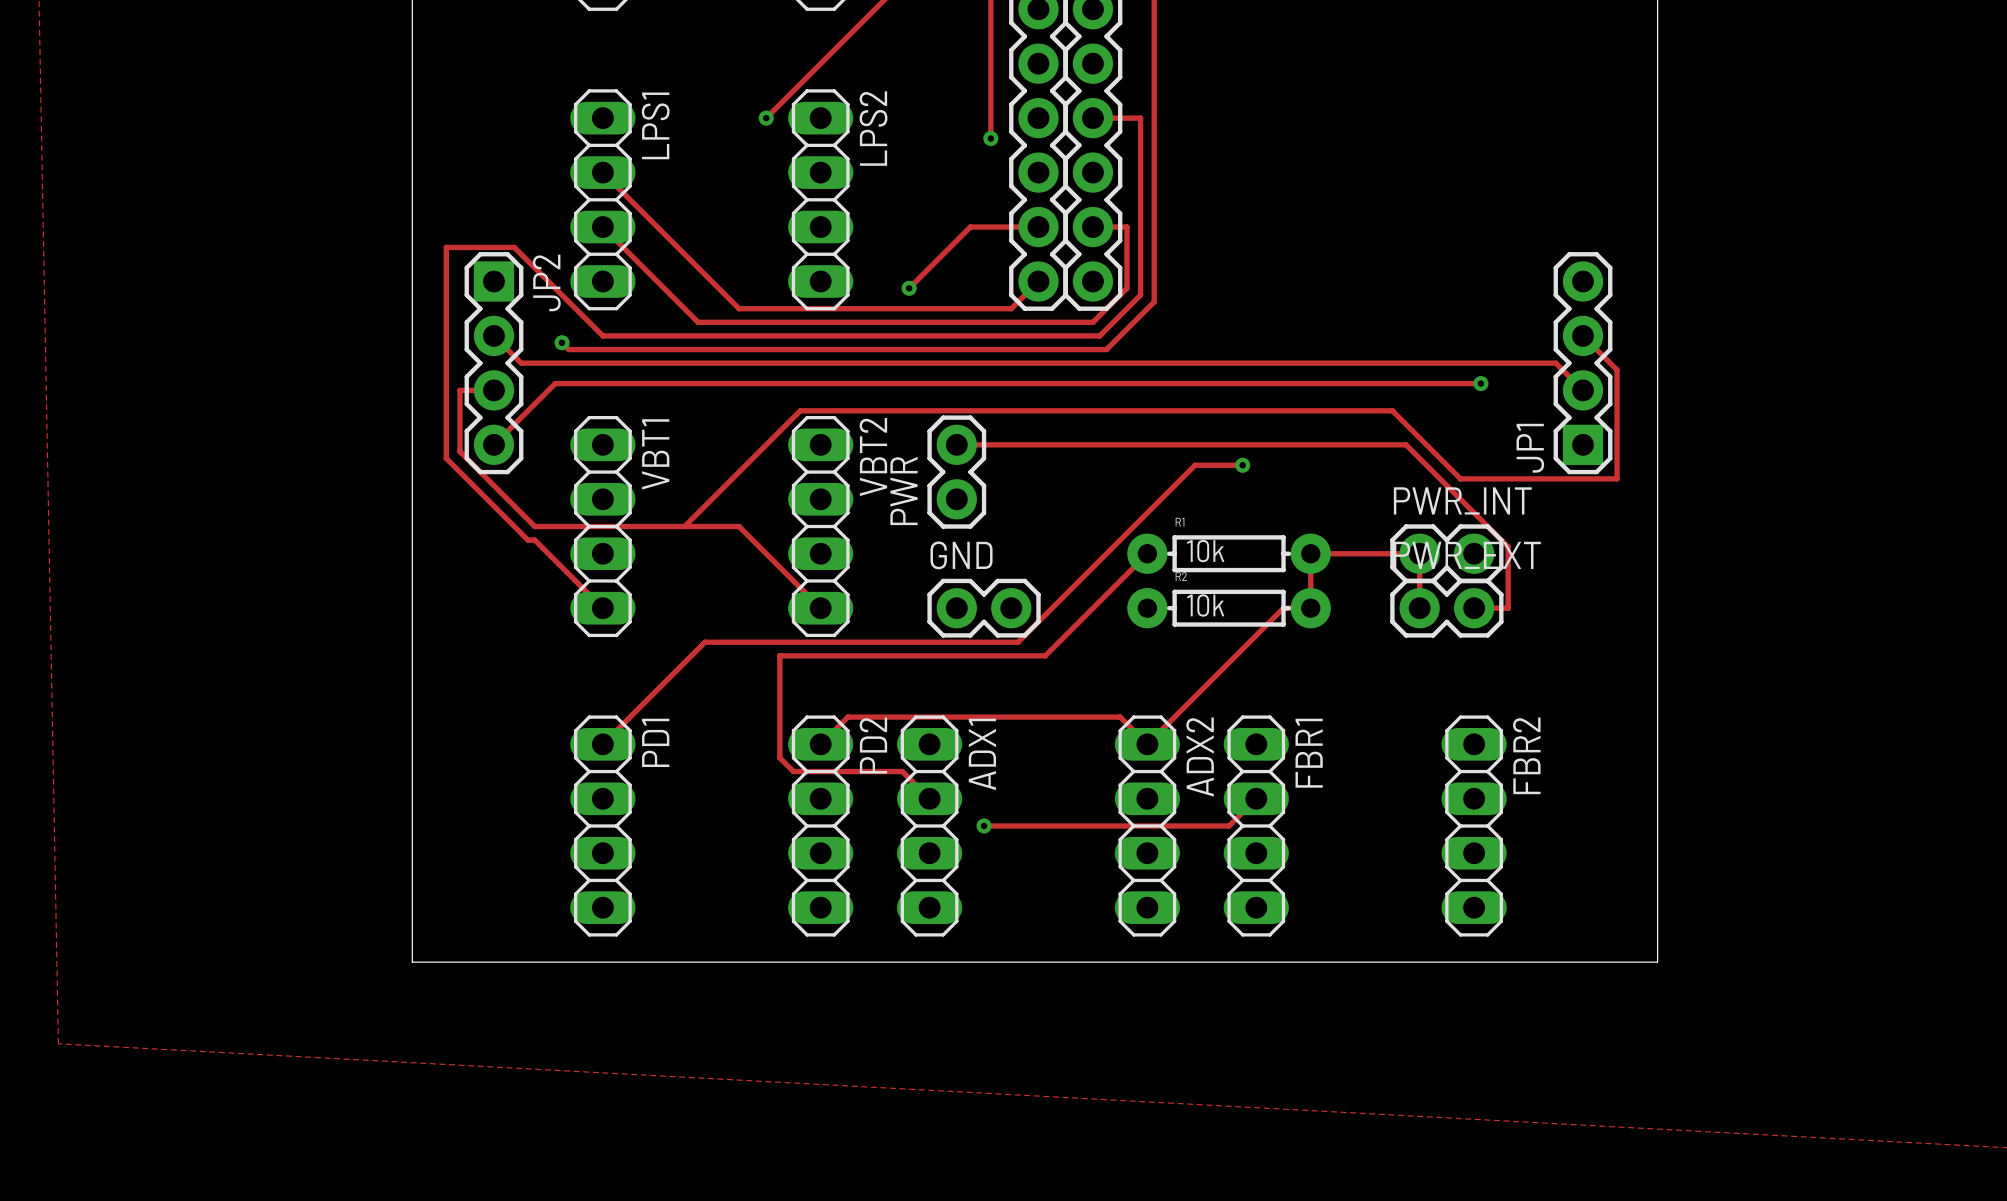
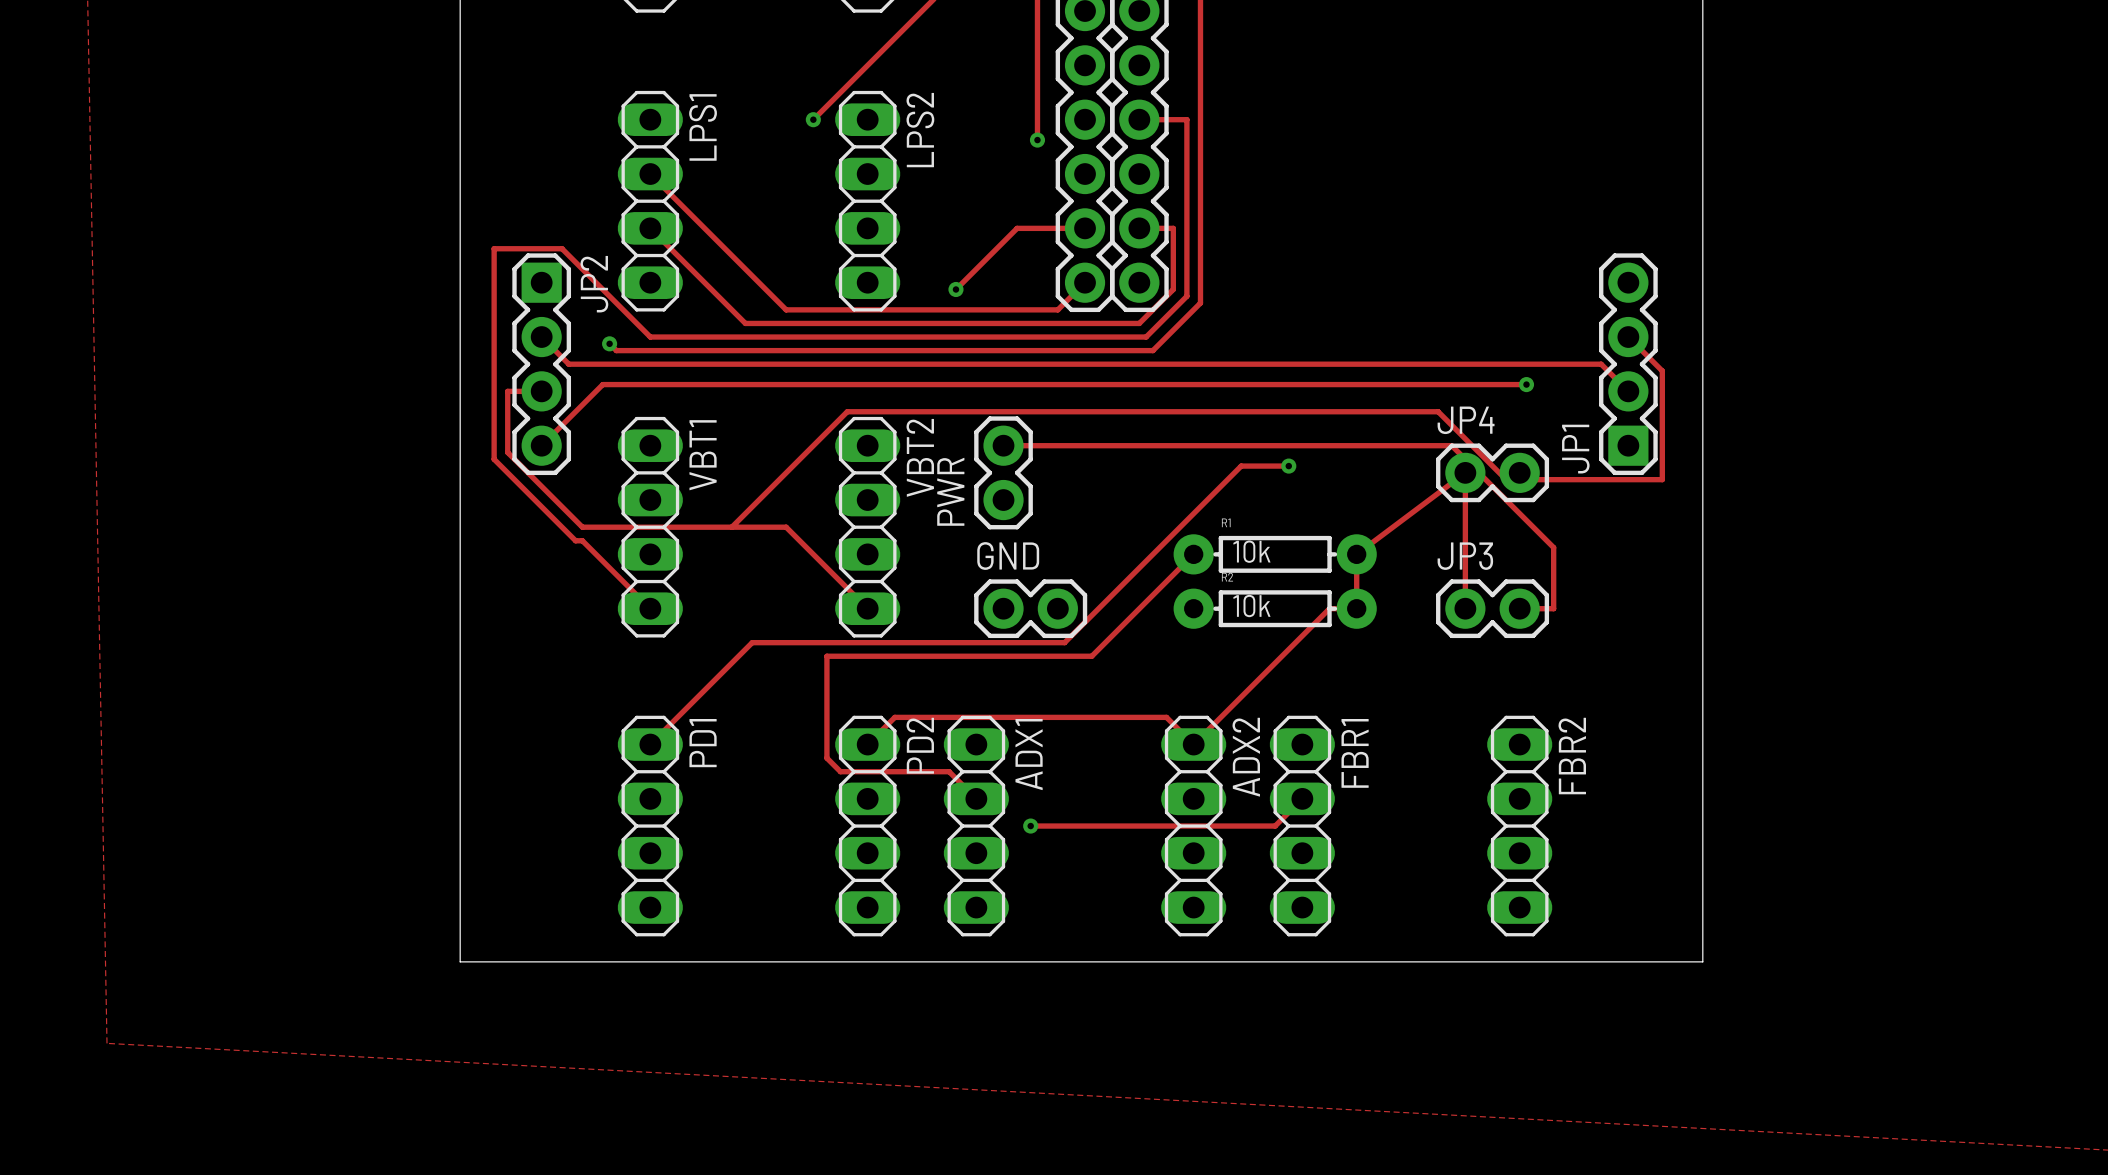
JP4: none -> (1492, 472)
track: (1310, 553) (1419, 553) -> (1356, 554) (1465, 472) (1465, 554)
PWR_INT: (1446, 553) -> none
PWR_EXT name: PWR_EXT (1467, 555) -> JP3 (1465, 556)

